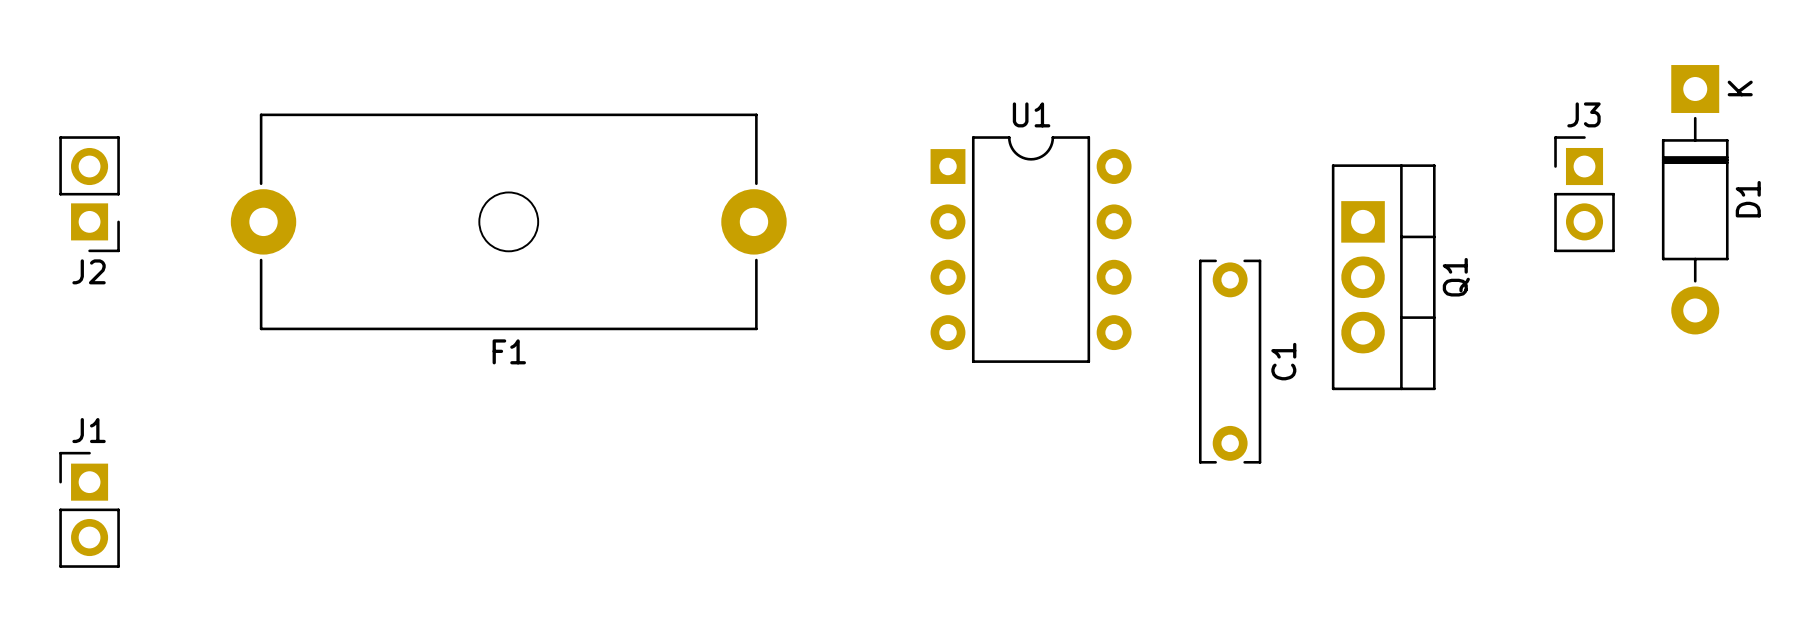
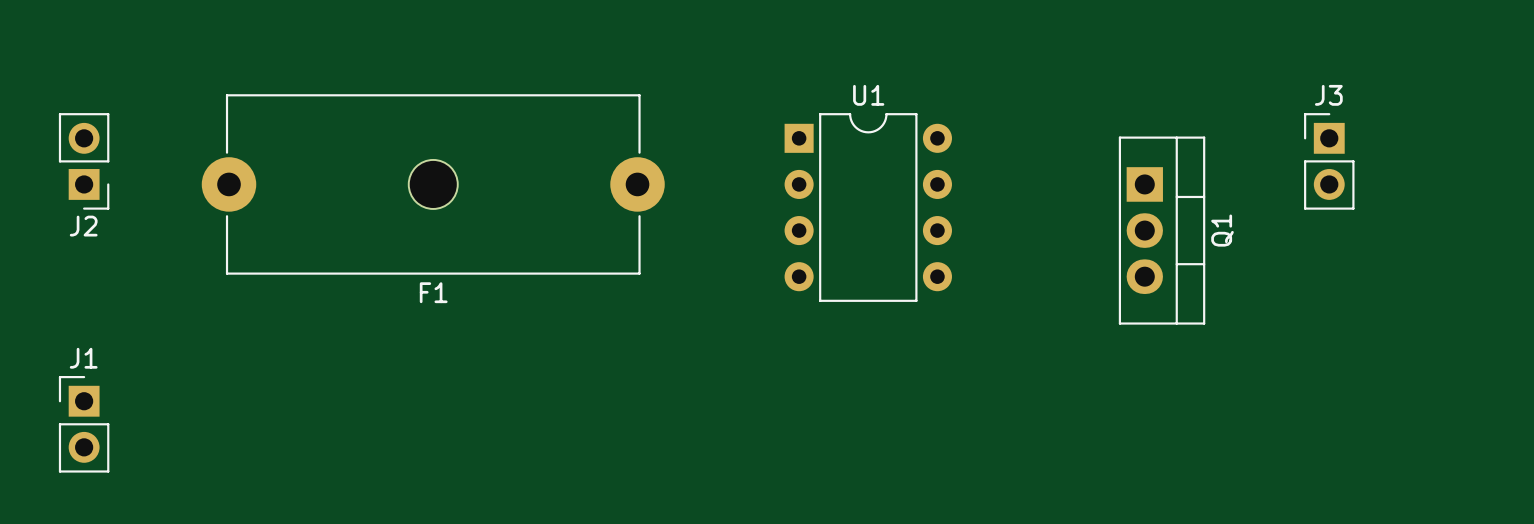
D1: (1695, 199) -> none
C1: (1230, 361) -> none

